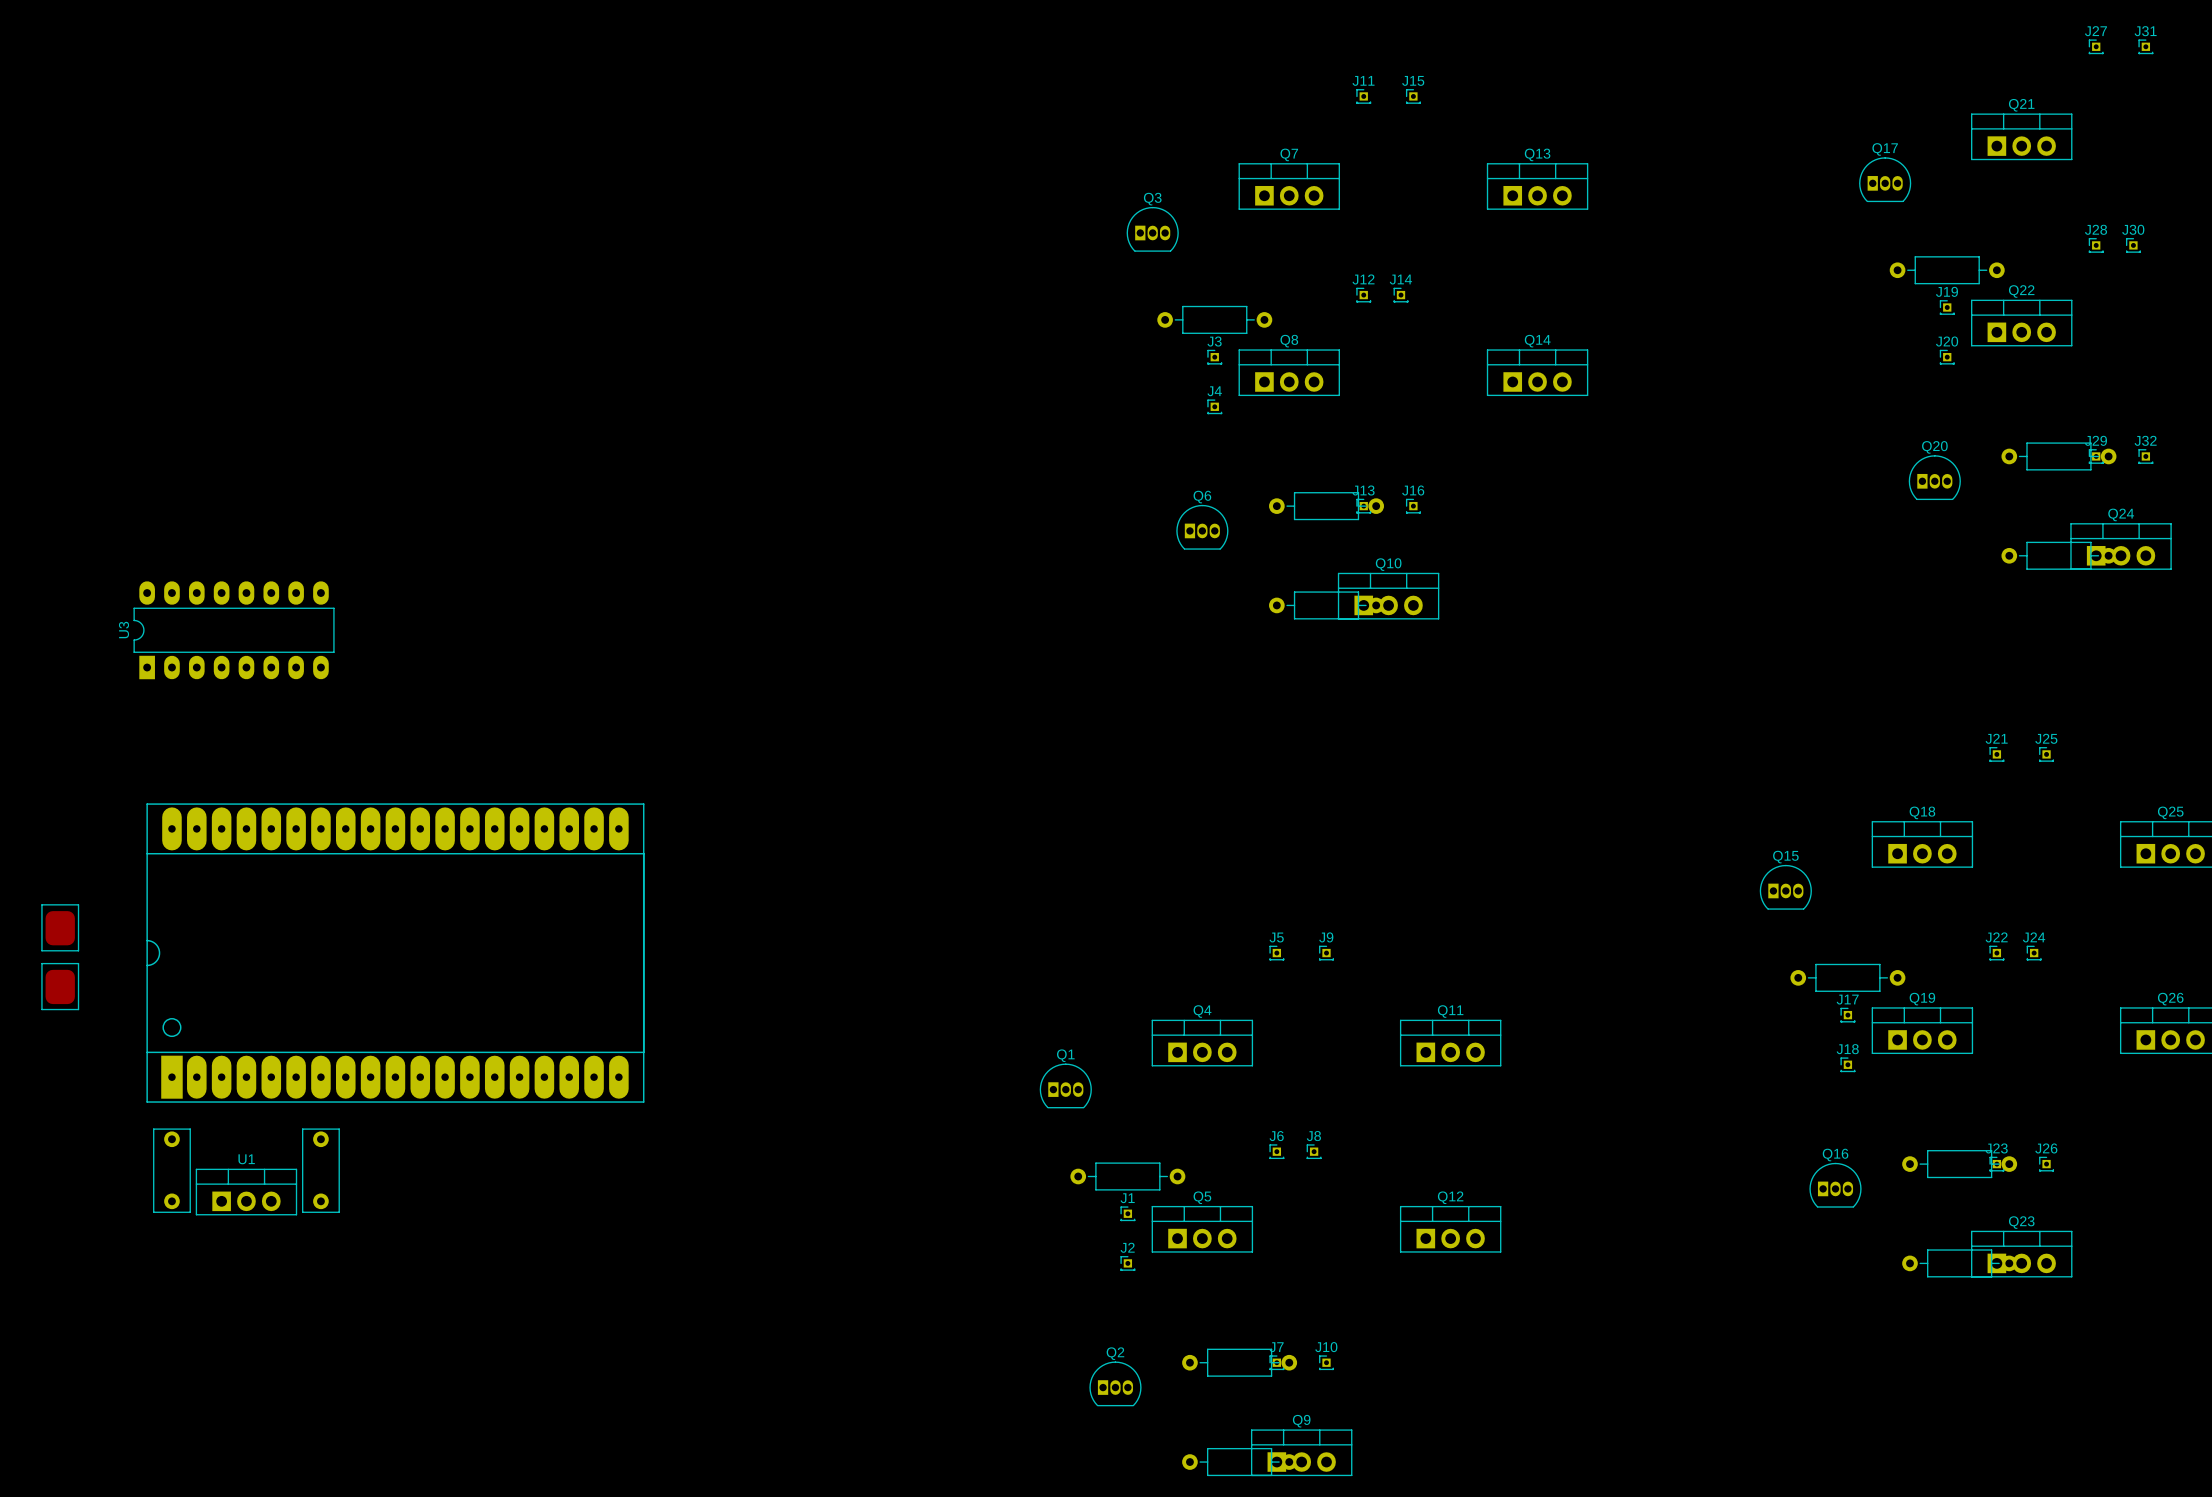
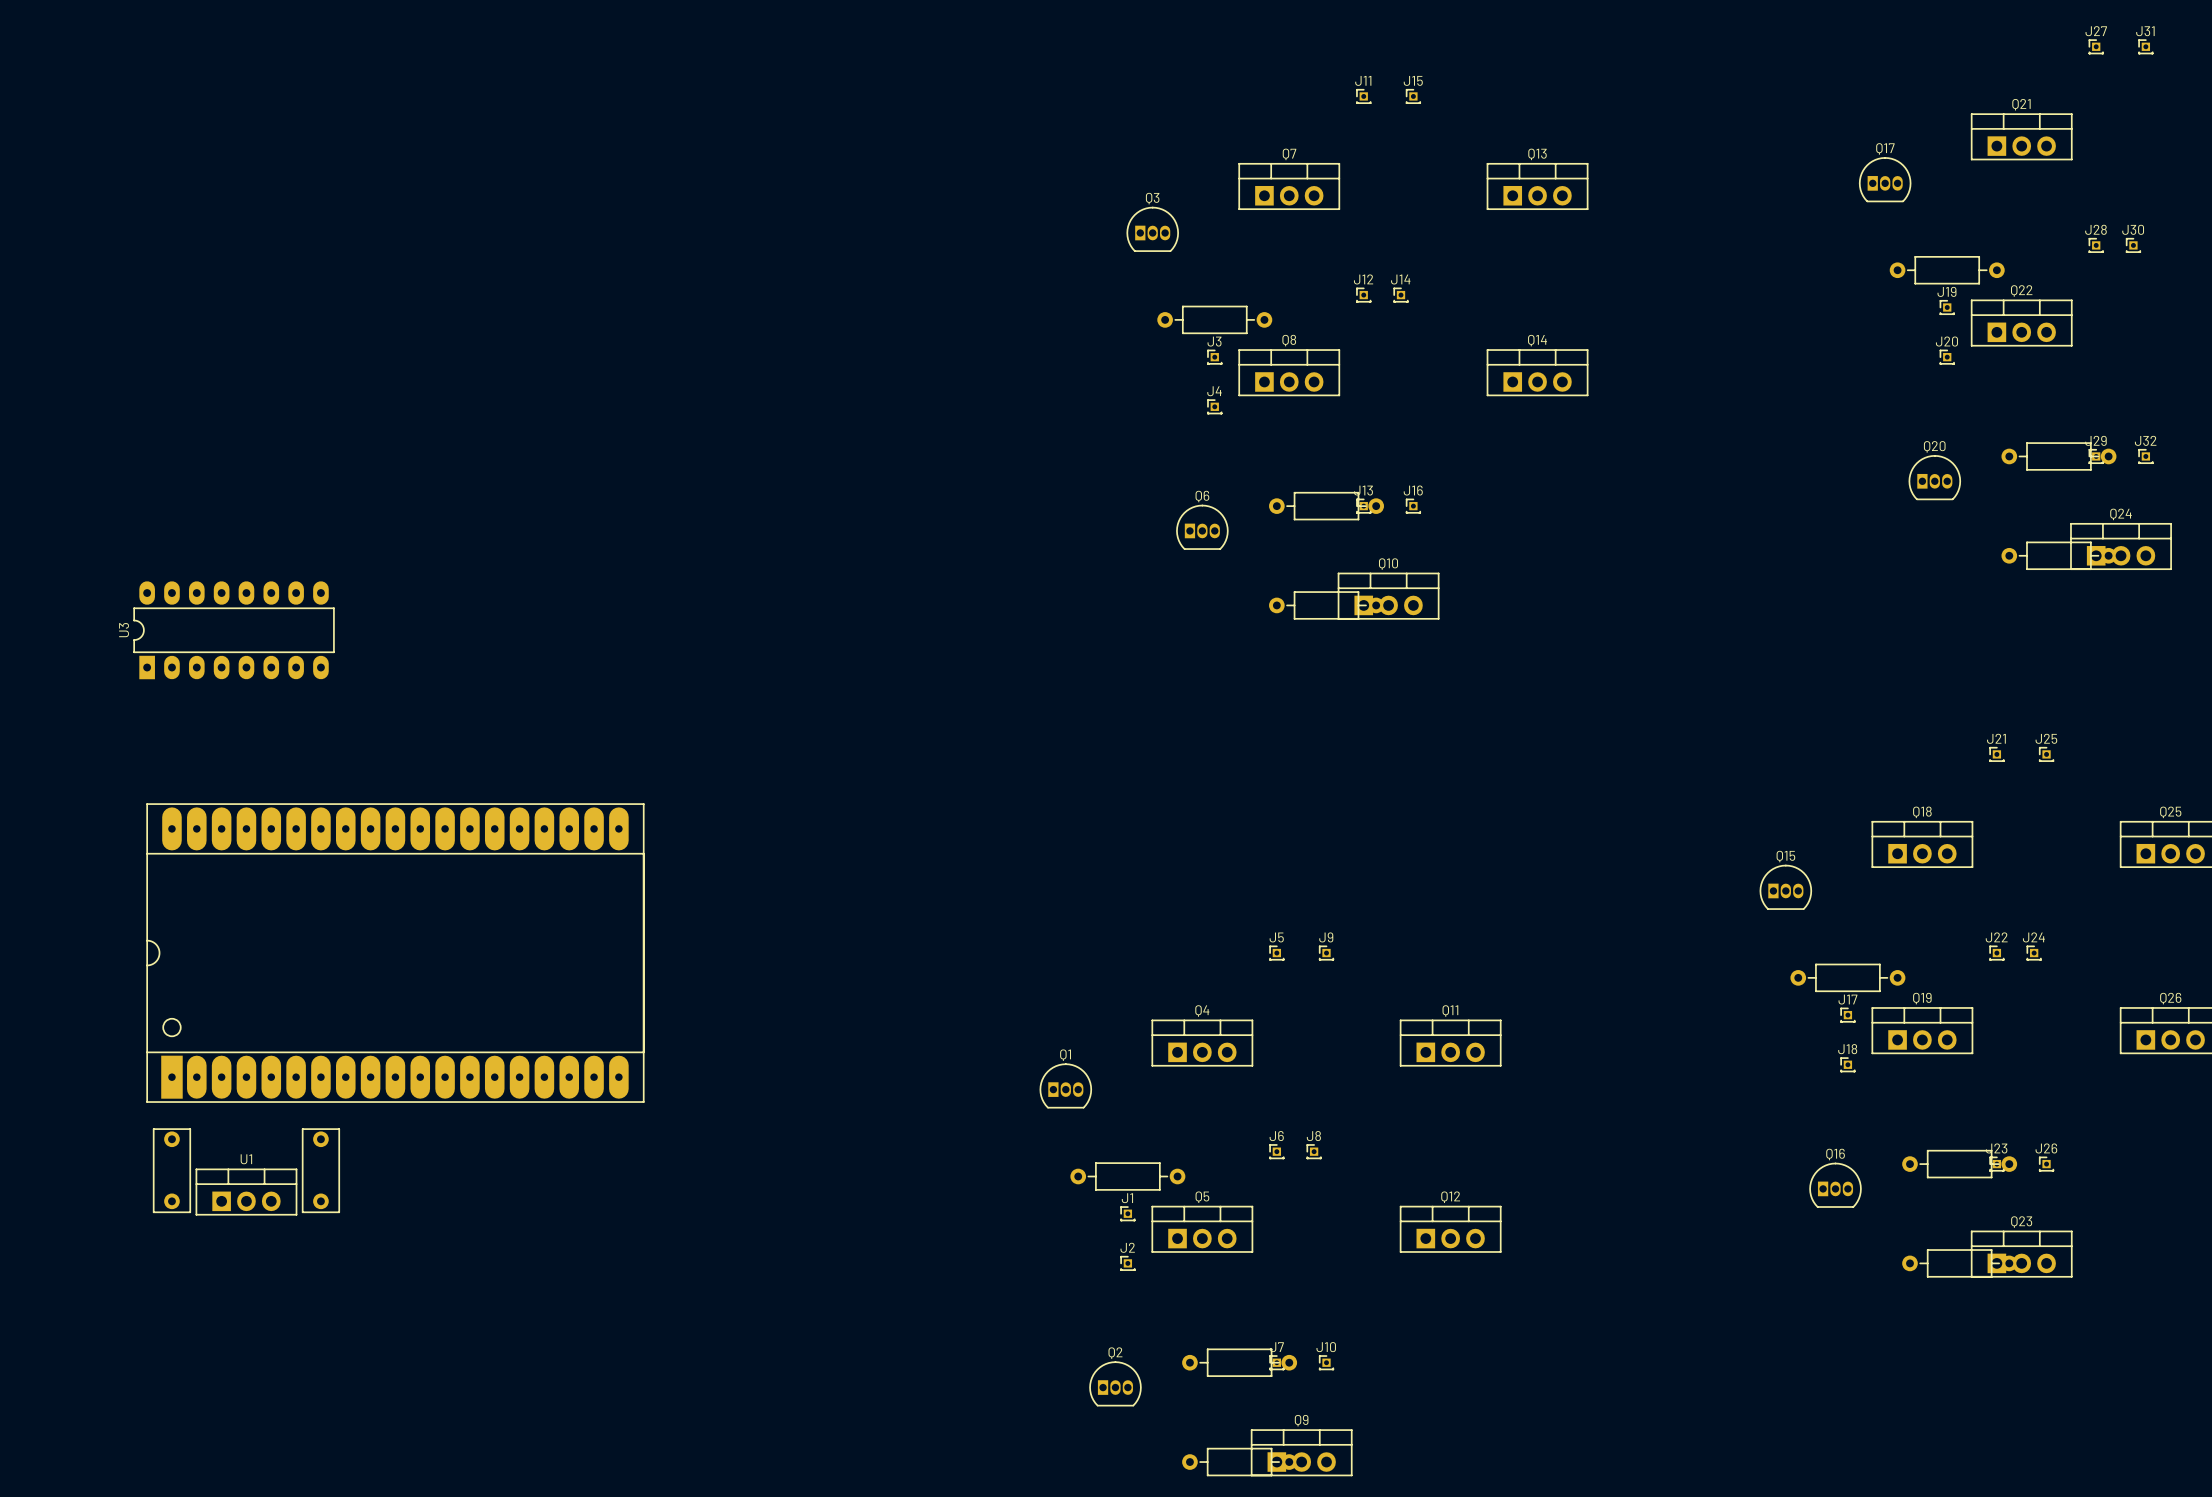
part: (60, 927) -> none
part: (60, 986) -> none

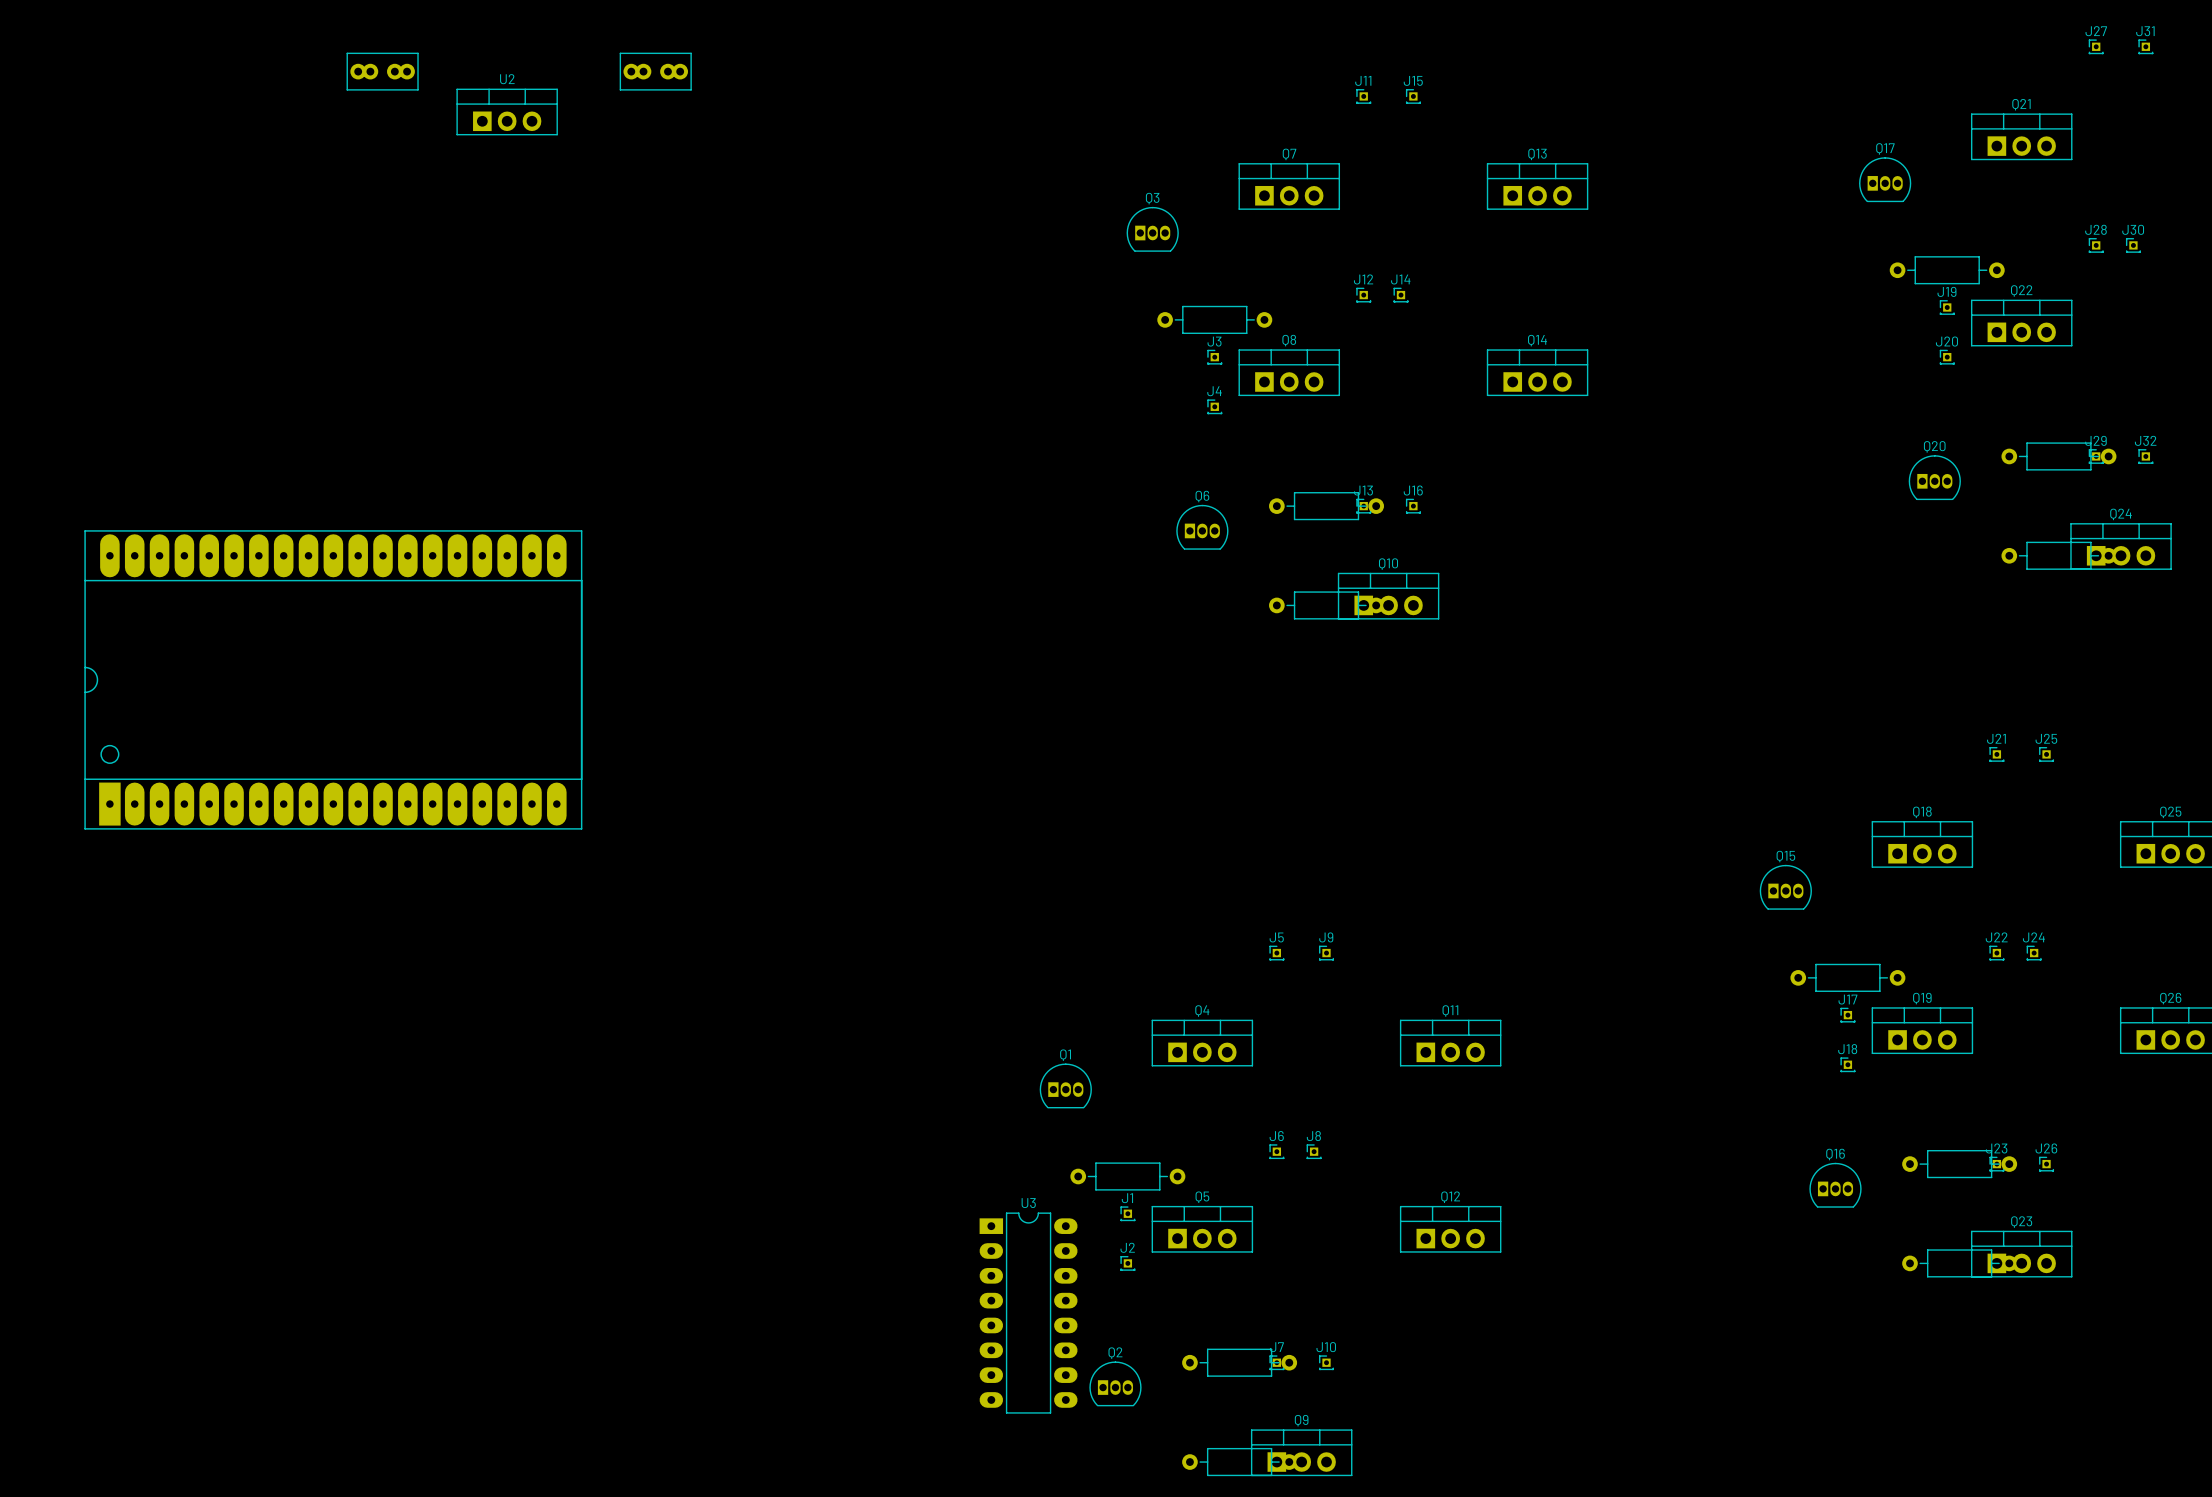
part: none -> (382, 71)
part: none -> (655, 71)
U2: none -> (507, 111)
U3 rotation: 0° (234, 630) -> 90° clockwise (1028, 1313)
U3 position: (234, 630) -> (1028, 1313)
part: none -> (333, 679)
part: (395, 953) -> none
part: (171, 1170) -> none
part: (320, 1170) -> none
U1: (246, 1192) -> none

